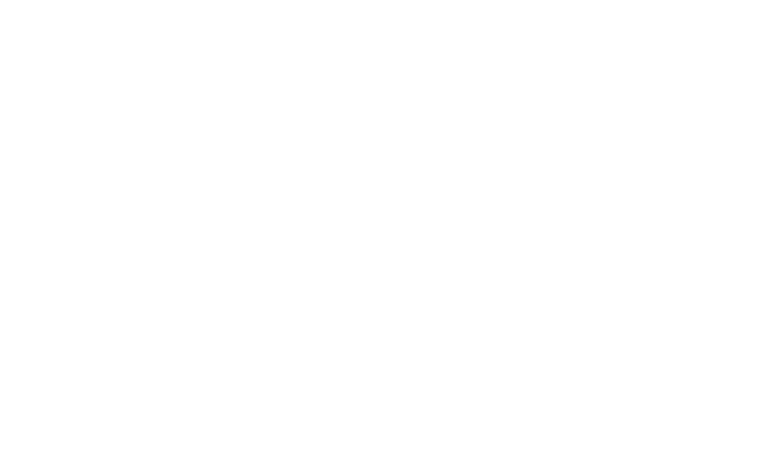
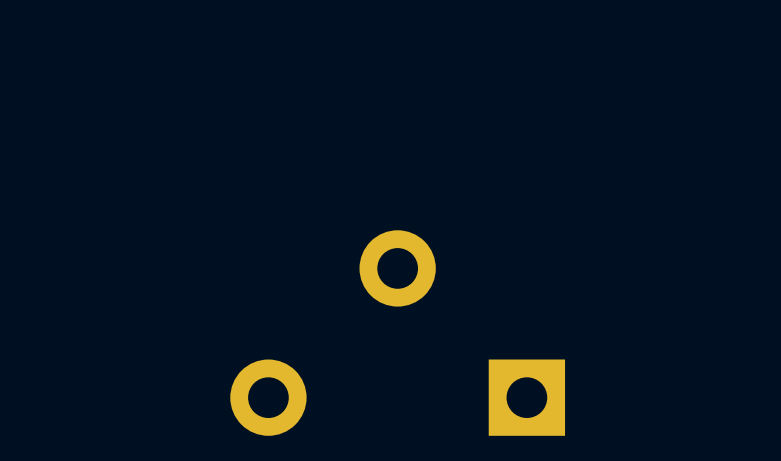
part: none -> (397, 333)

